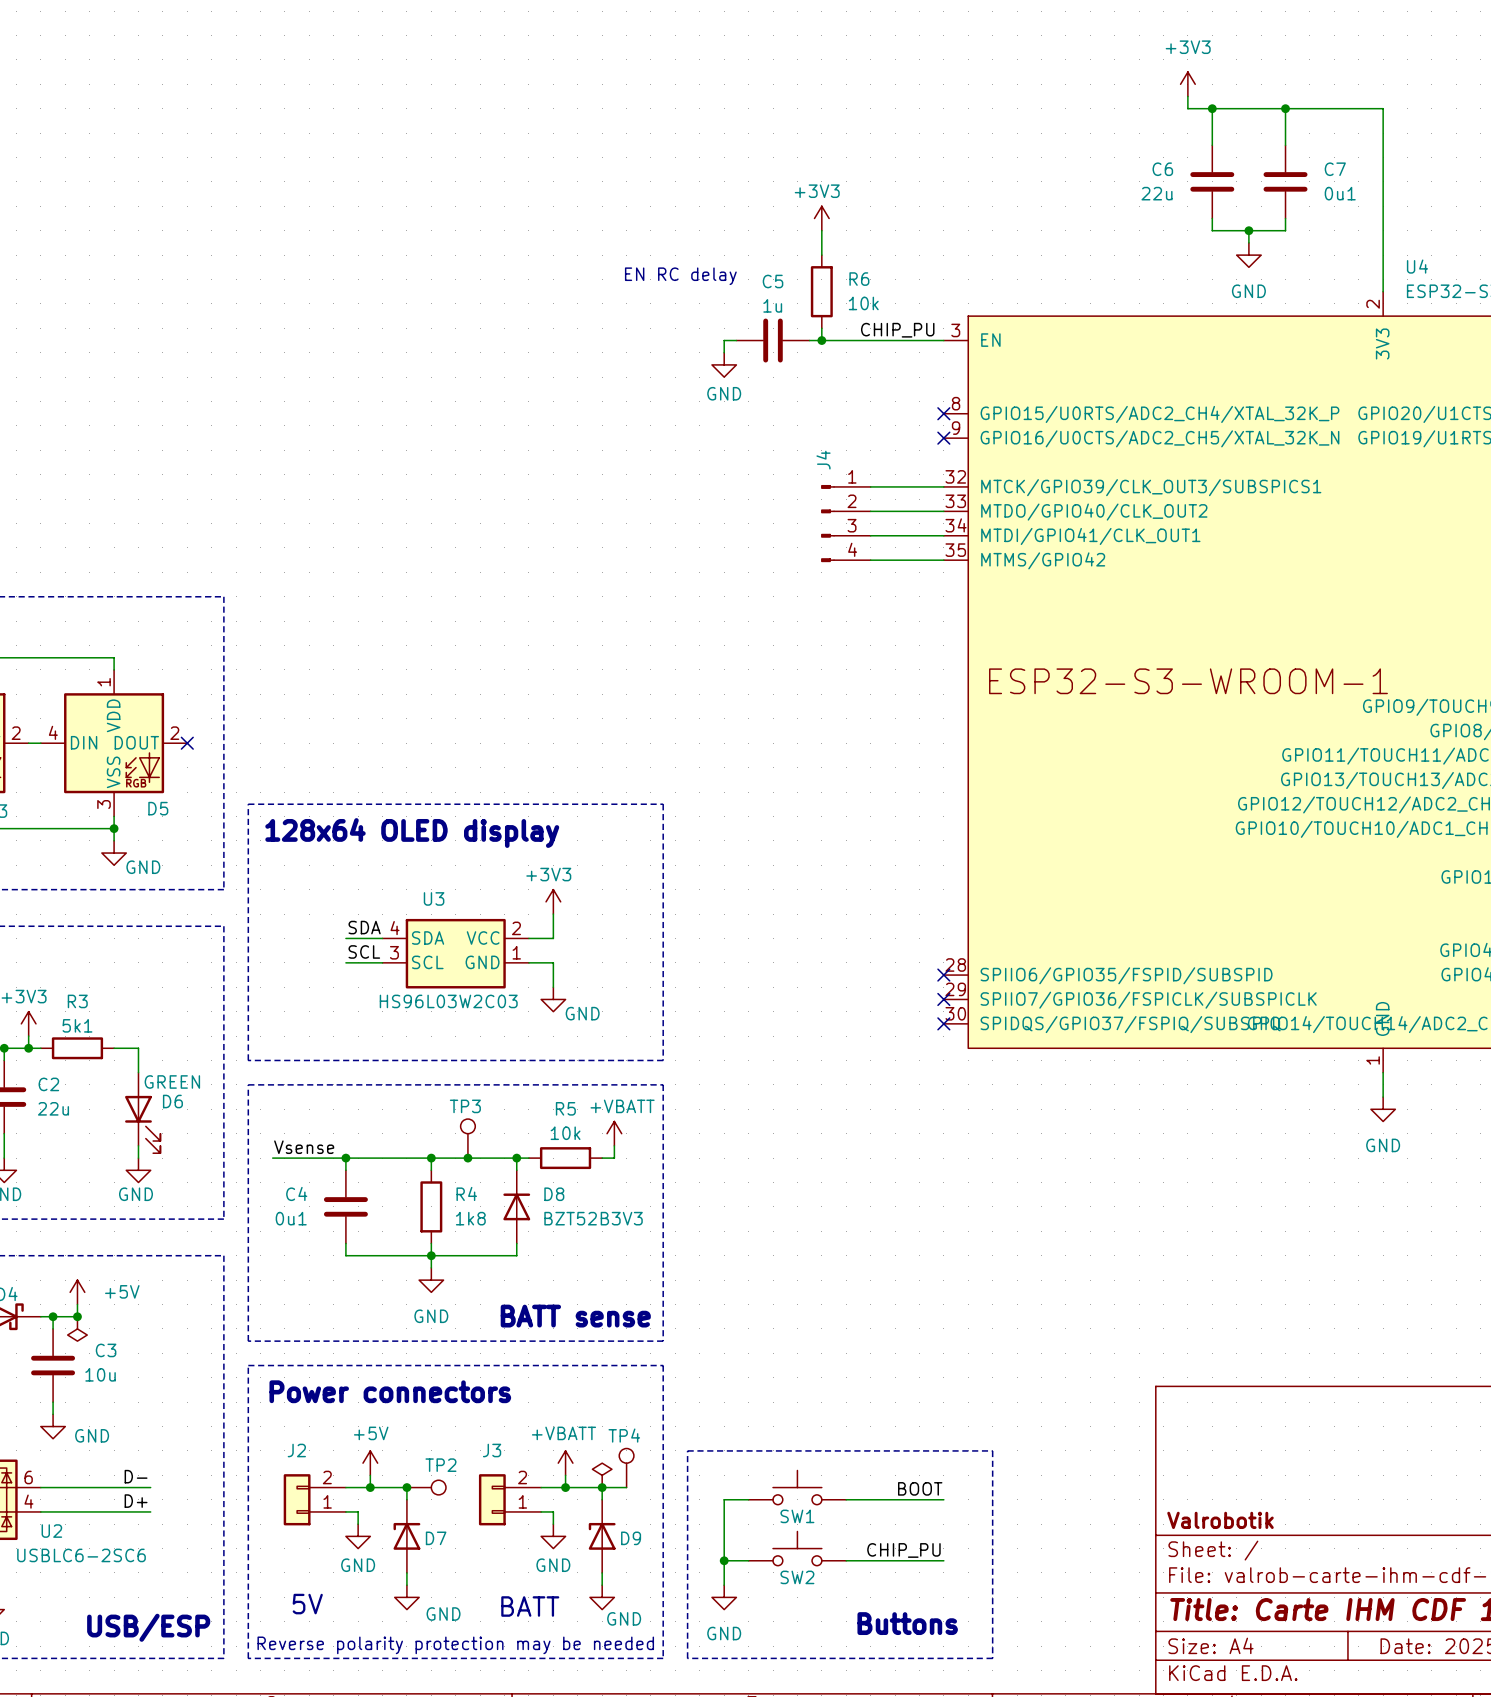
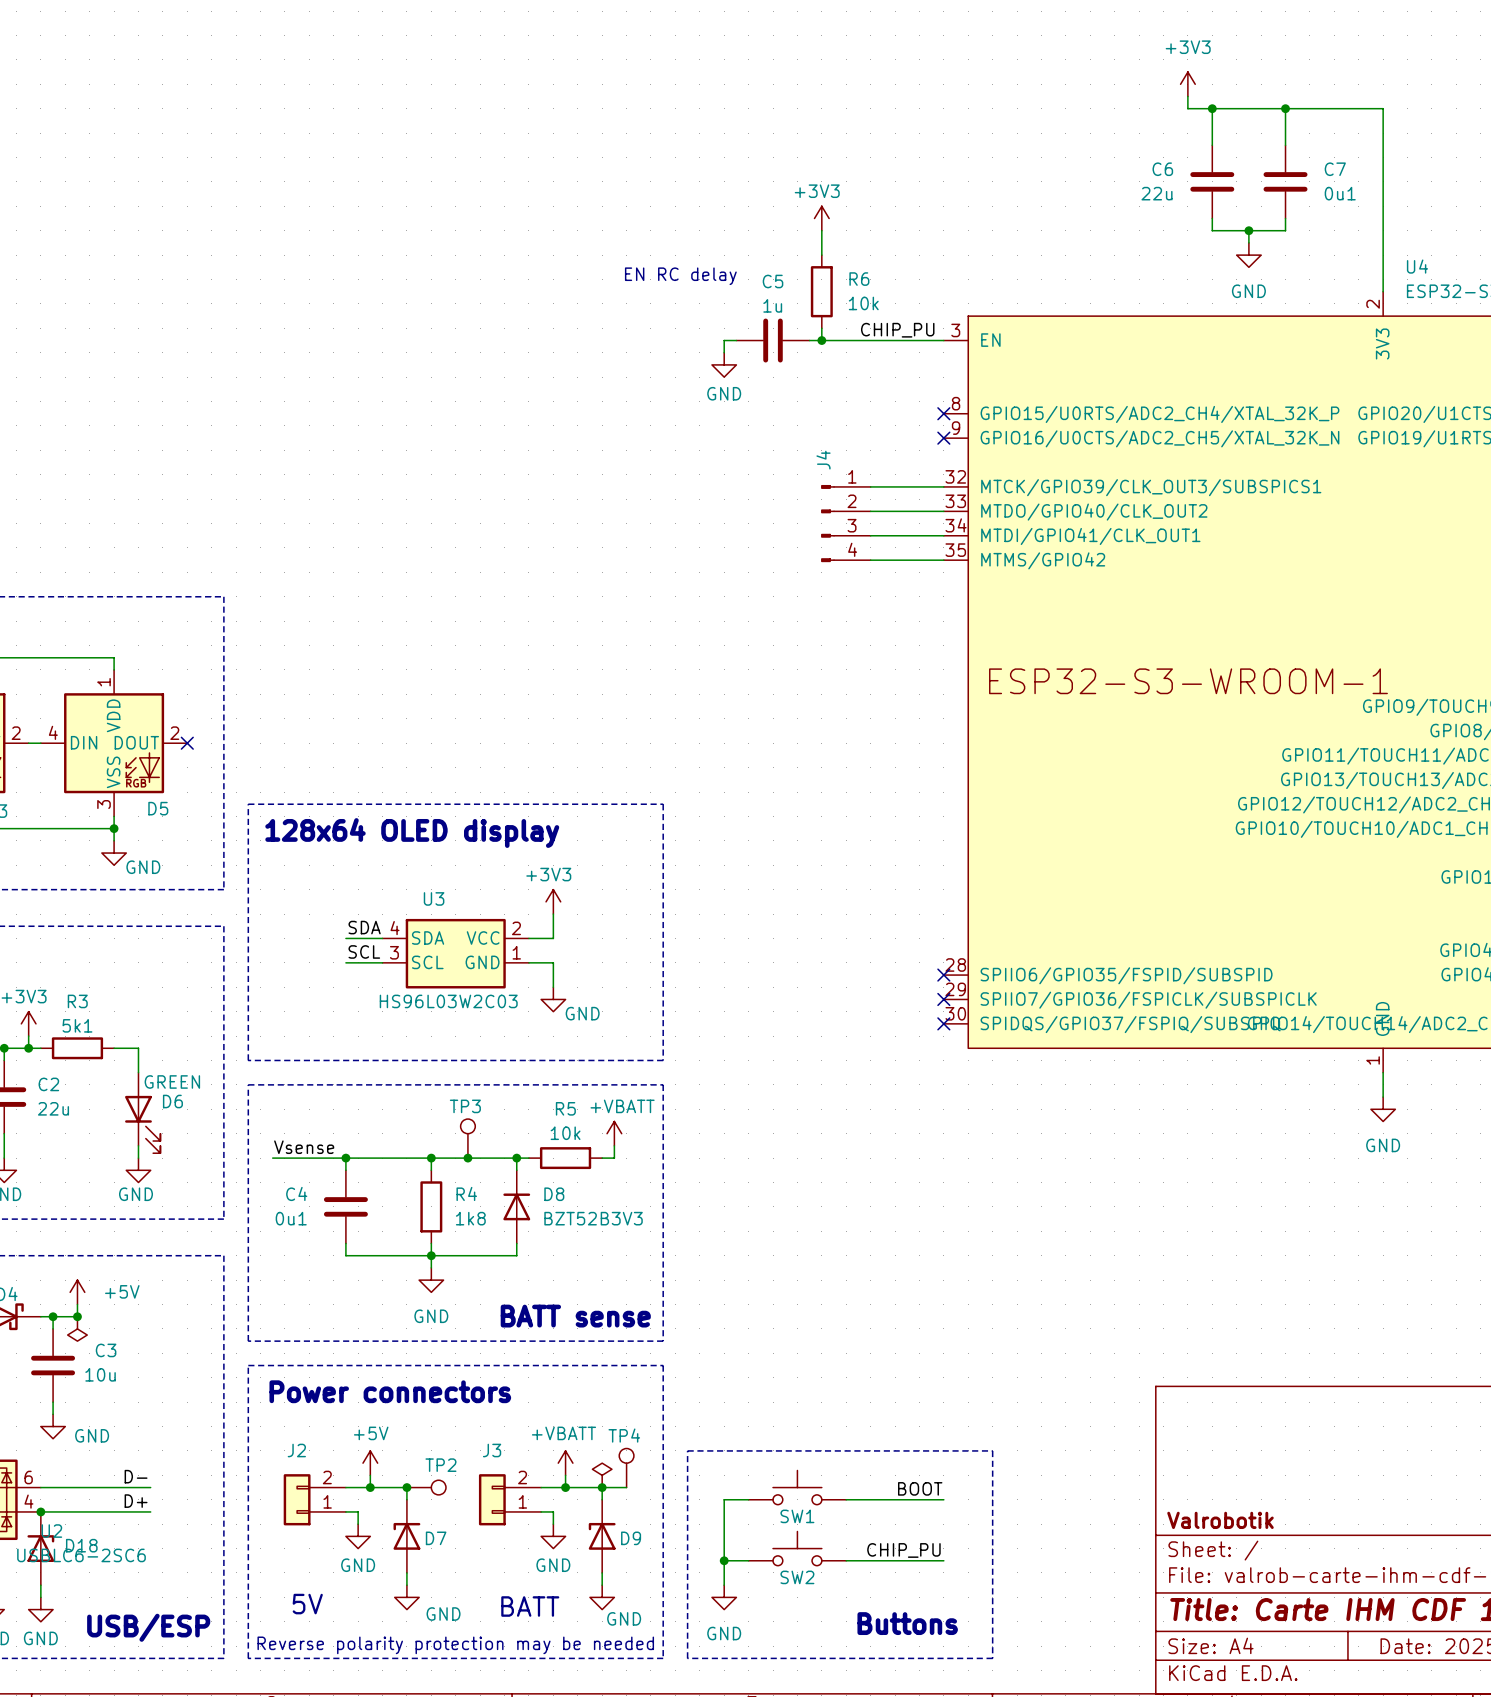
junction: none -> (40, 1511)
D18: none -> (40, 1548)
wire: none -> (40, 1585) (40, 1597)
power symbol: none -> GND (40, 1609)

